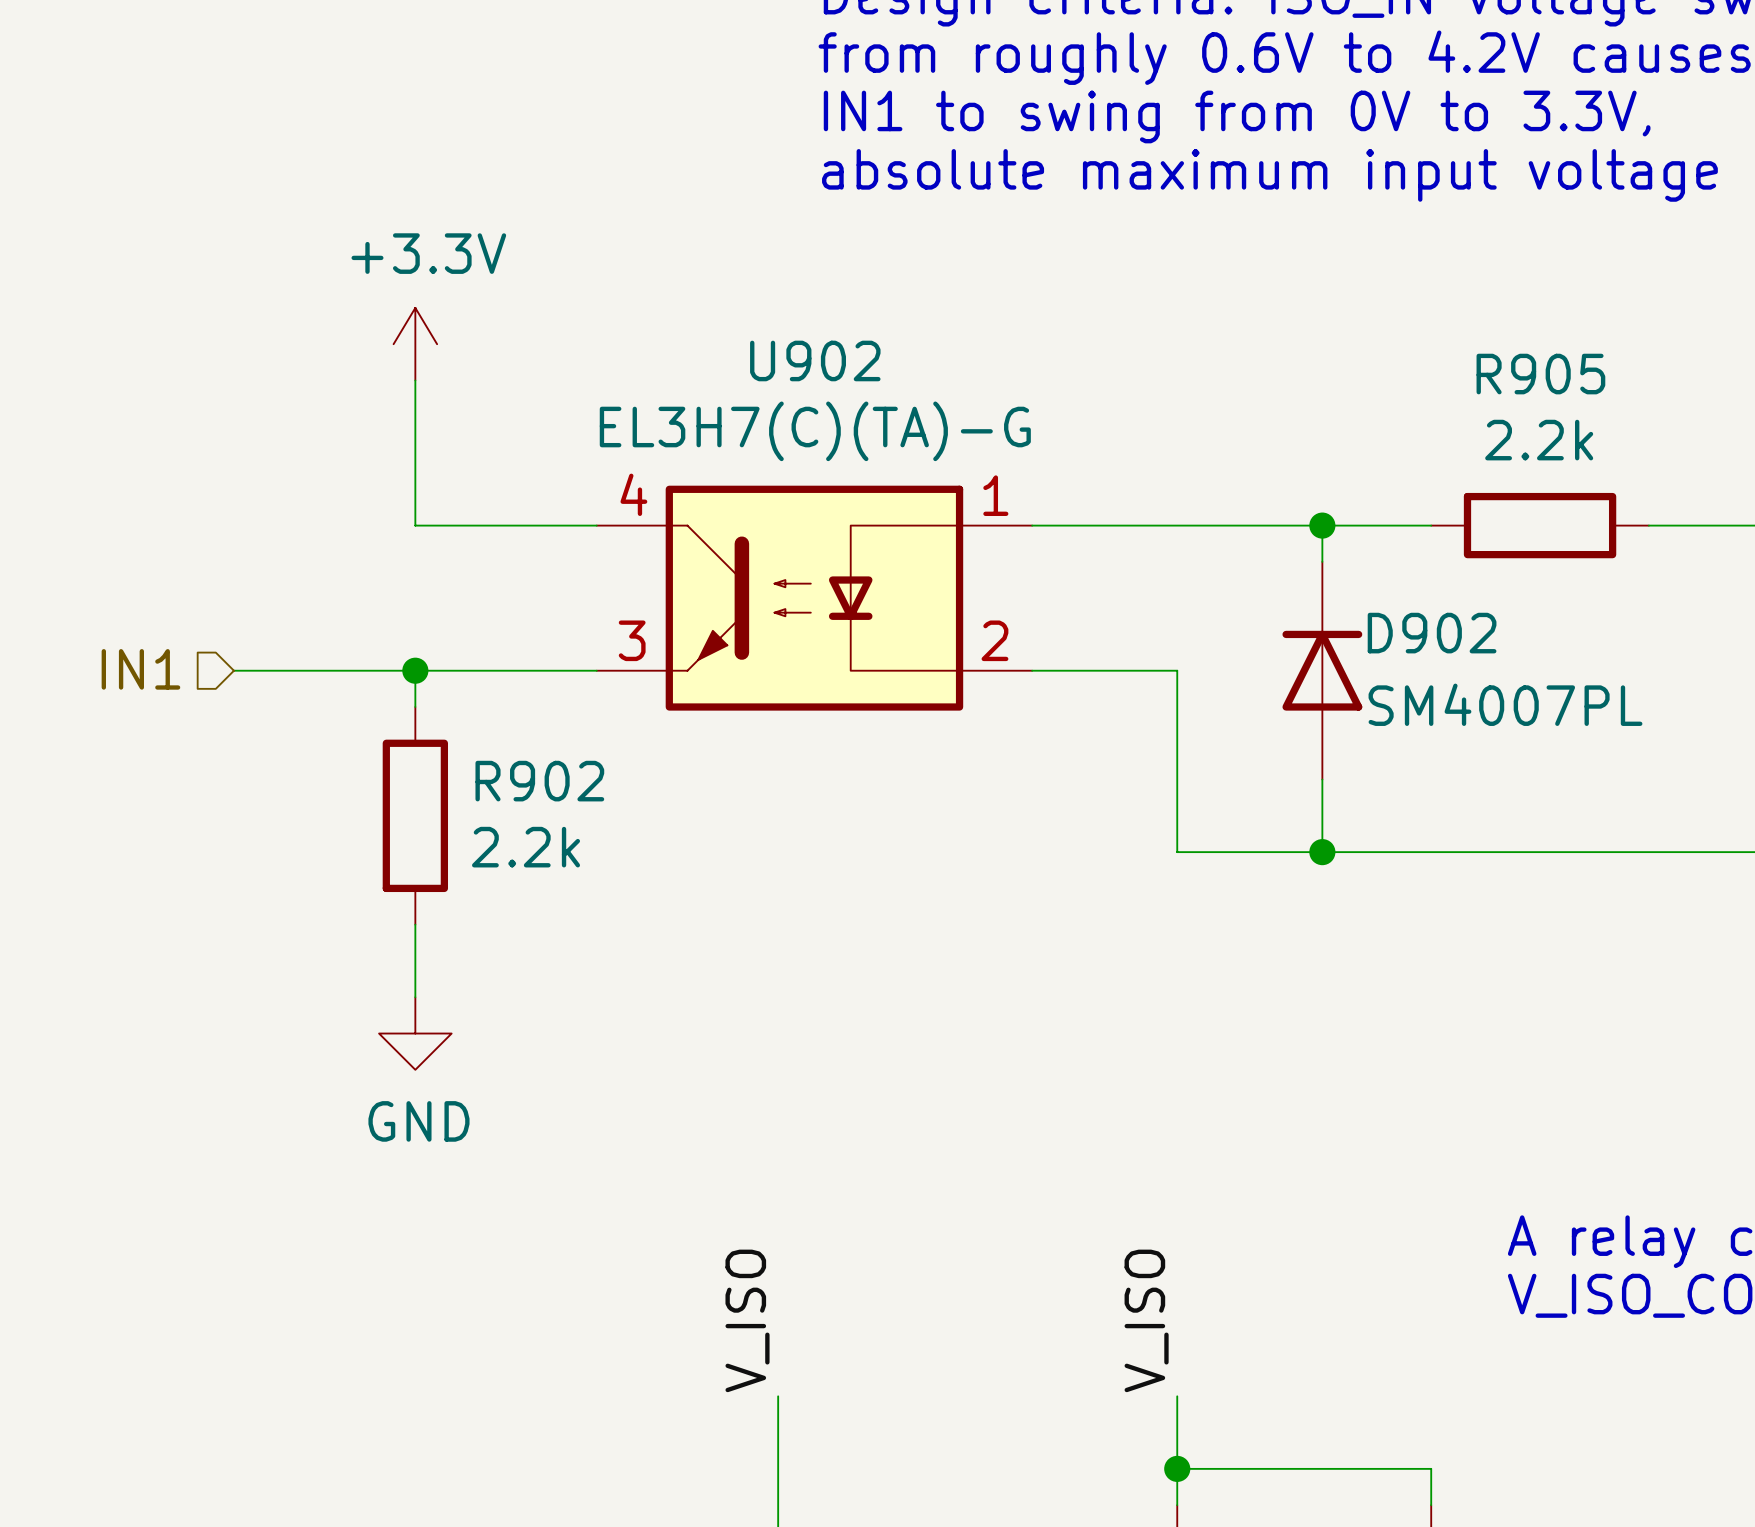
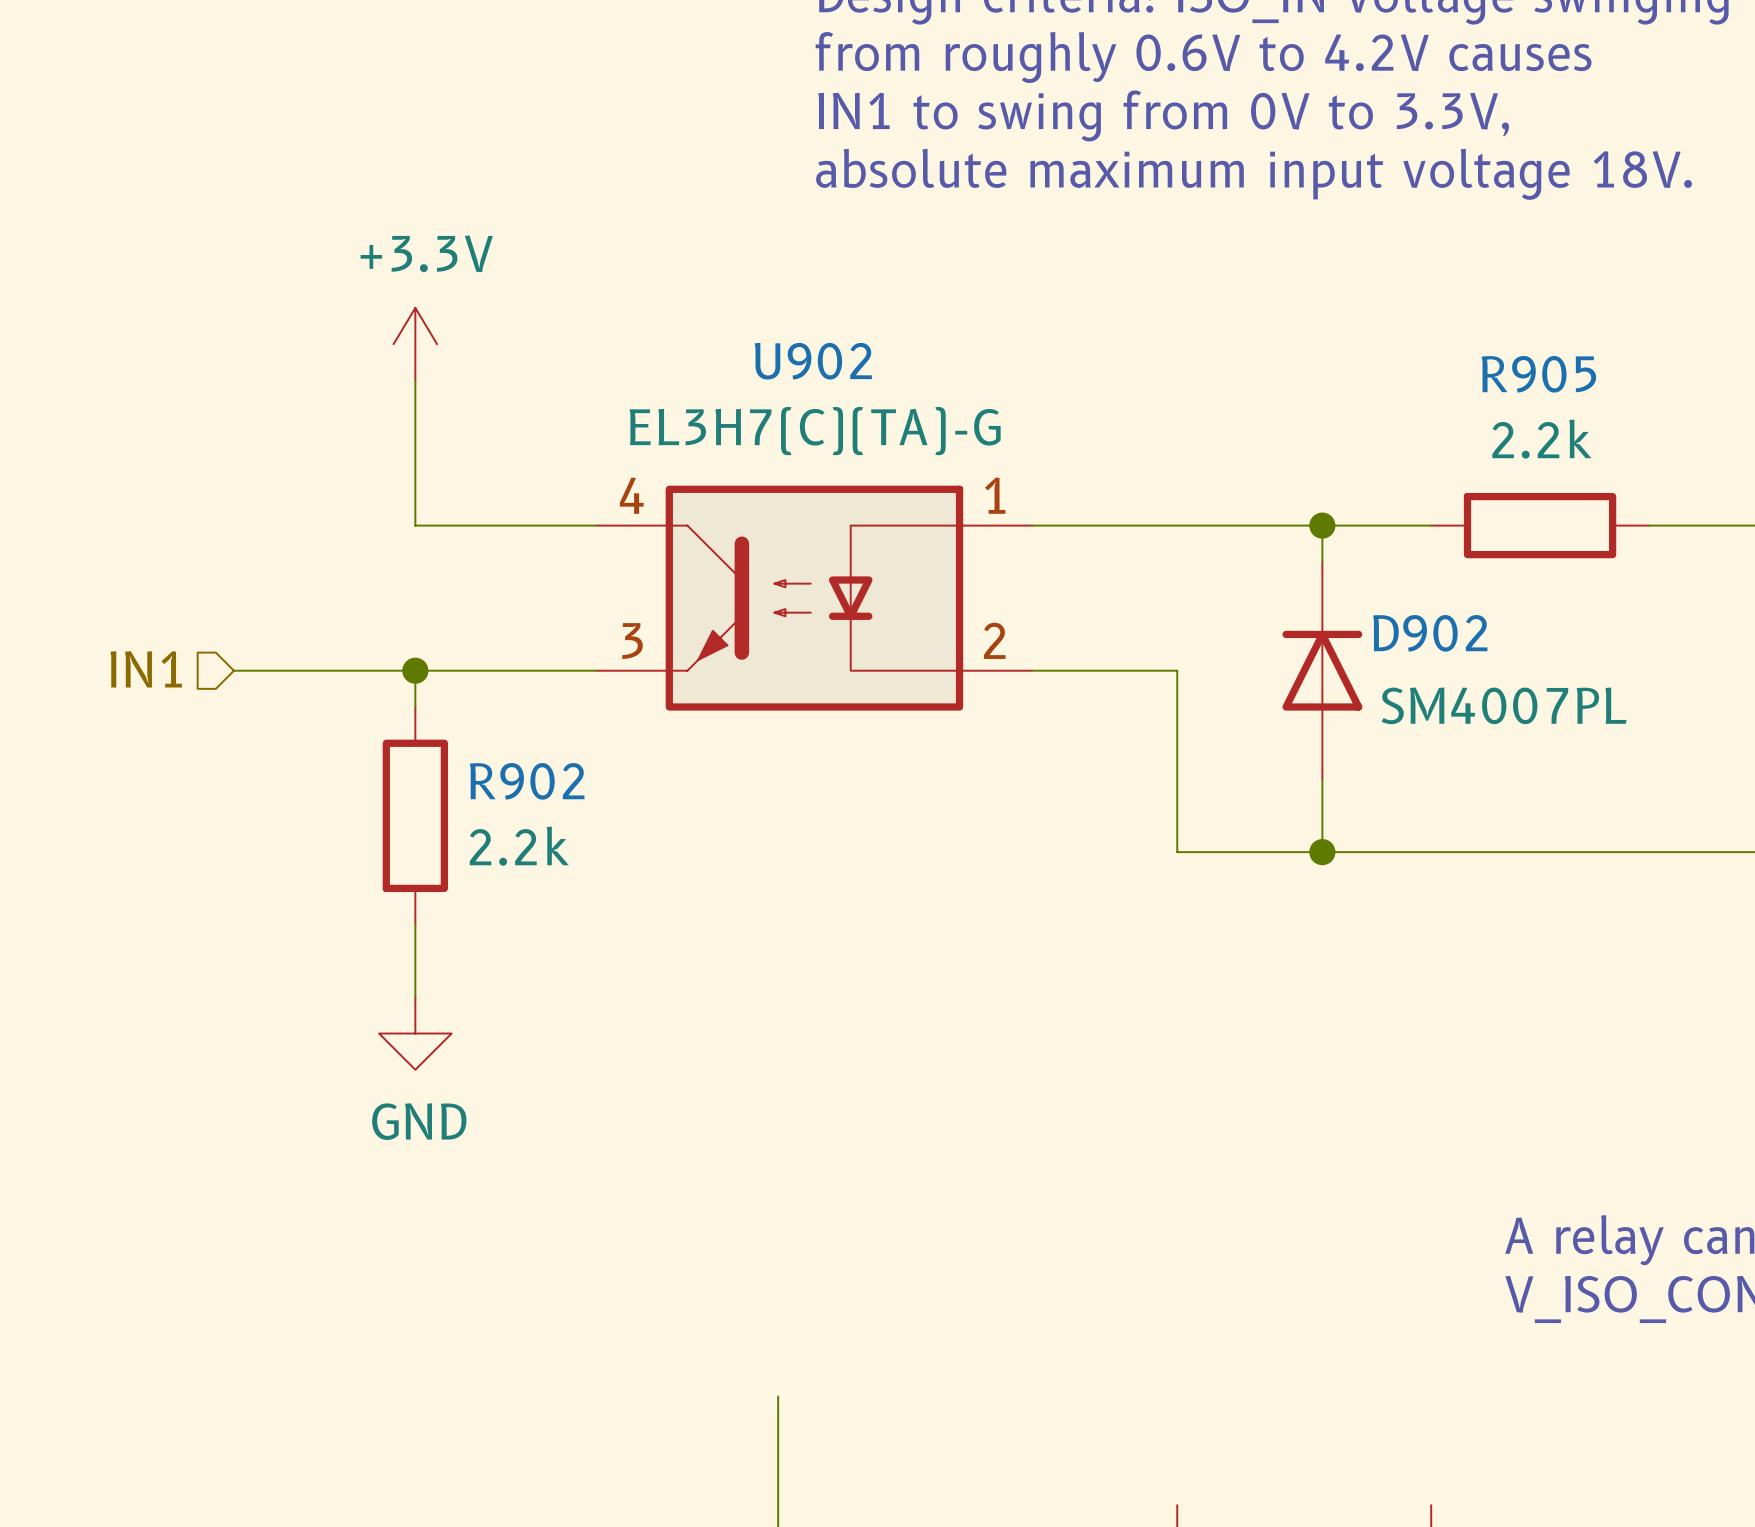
label: V_ISO (747, 1320) -> none
label: V_ISO (1146, 1320) -> none
wire: (1177, 1396) (1177, 1505) -> none
wire: (1177, 1468) (1431, 1468) (1431, 1505) -> none
junction: (1177, 1468) -> none

